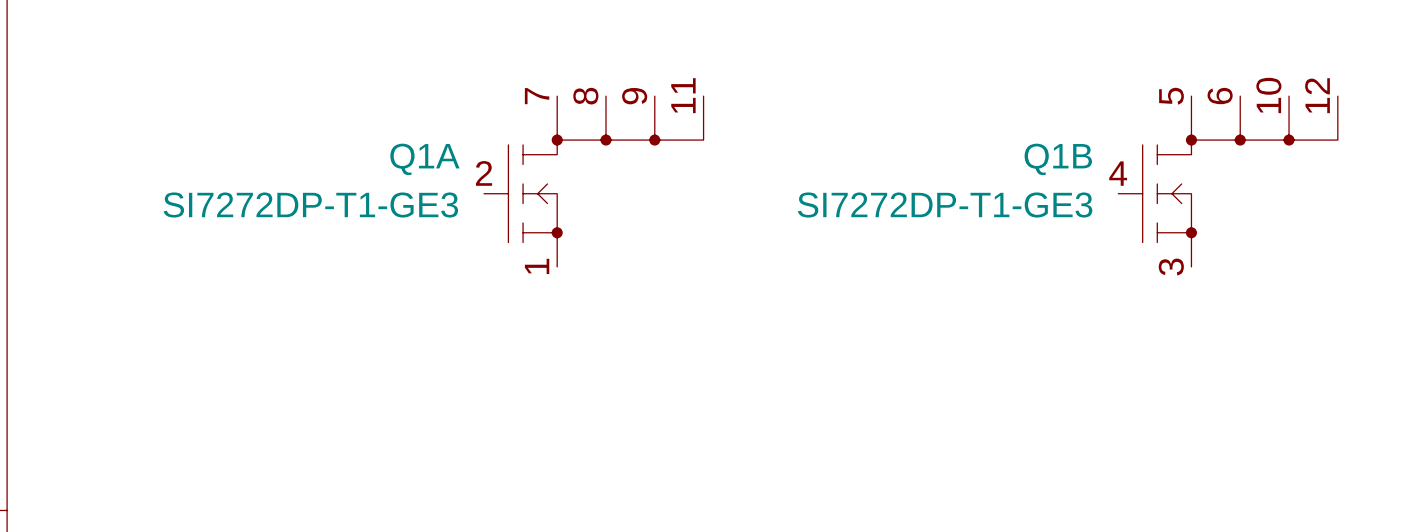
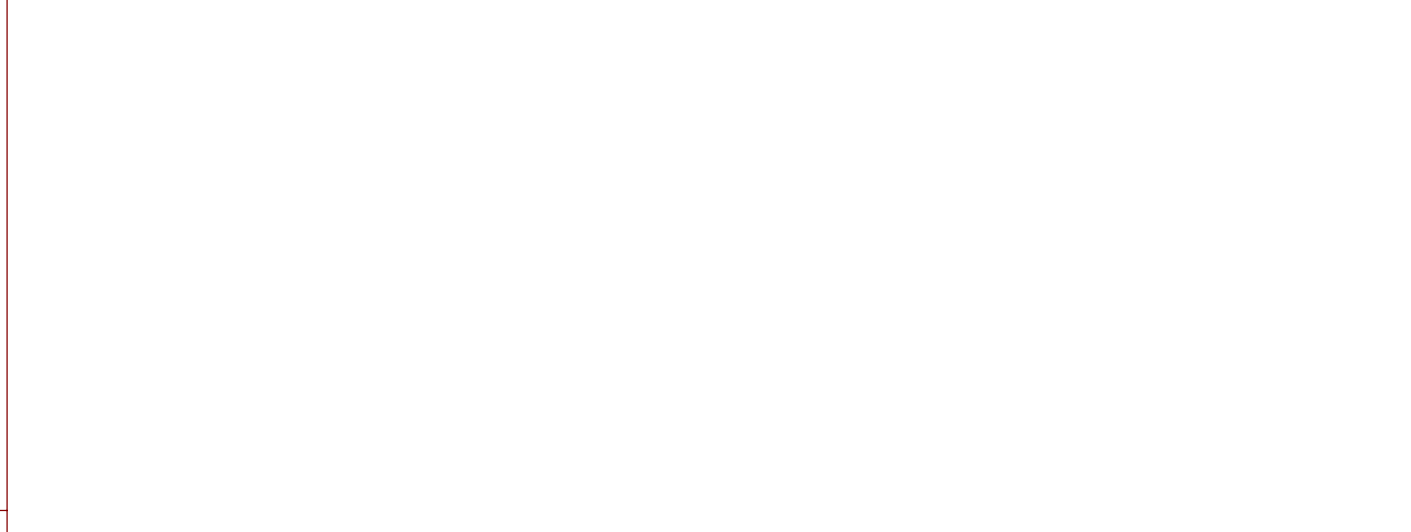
Q1A: SI7272DP-T1-GE3 (593, 181) -> none
Q1B: SI7272DP-T1-GE3 (1228, 181) -> none

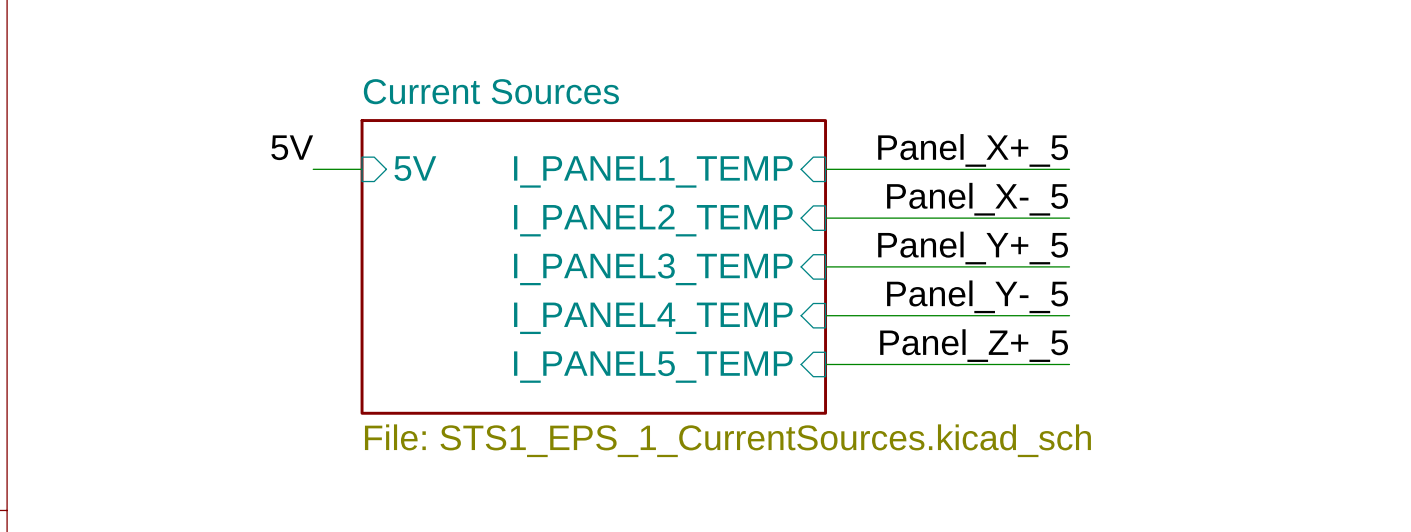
label: none -> 5V (292, 147)
label: none -> Panel_X+_5 (973, 150)
sheet pin: none -> 5V (415, 168)
wire: none -> (313, 169) (362, 169)
wire: none -> (825, 169) (1069, 169)
sheet pin: none -> I_PANEL1_TEMP (653, 171)
label: none -> Panel_X-_5 (977, 199)
wire: none -> (825, 218) (1069, 218)
sheet pin: none -> I_PANEL2_TEMP (653, 220)
label: none -> Panel_Y+_5 (973, 248)
sheet Current Sources: none -> File: STS1_EPS_1_CurrentSources.kicad_sch (593, 266)
wire: none -> (825, 266) (1069, 266)
sheet pin: none -> I_PANEL3_TEMP (653, 269)
label: none -> Panel_Y-_5 (977, 296)
wire: none -> (825, 315) (1069, 315)
sheet pin: none -> I_PANEL4_TEMP (653, 318)
label: none -> Panel_Z+_5 (974, 345)
wire: none -> (825, 364) (1069, 364)
sheet pin: none -> I_PANEL5_TEMP (653, 367)

